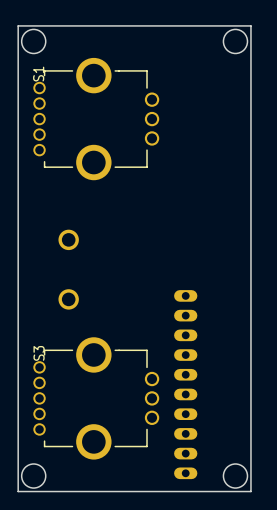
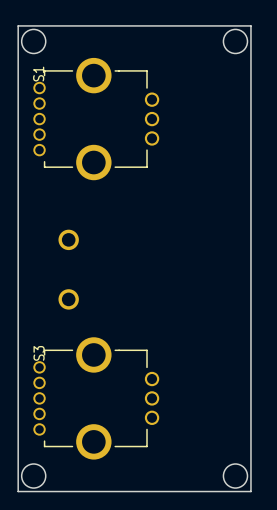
part: (185, 295) -> none
part: (185, 315) -> none
part: (185, 335) -> none
part: (185, 355) -> none
part: (185, 374) -> none
part: (185, 394) -> none
part: (185, 414) -> none
part: (185, 433) -> none
part: (185, 453) -> none
part: (185, 473) -> none

